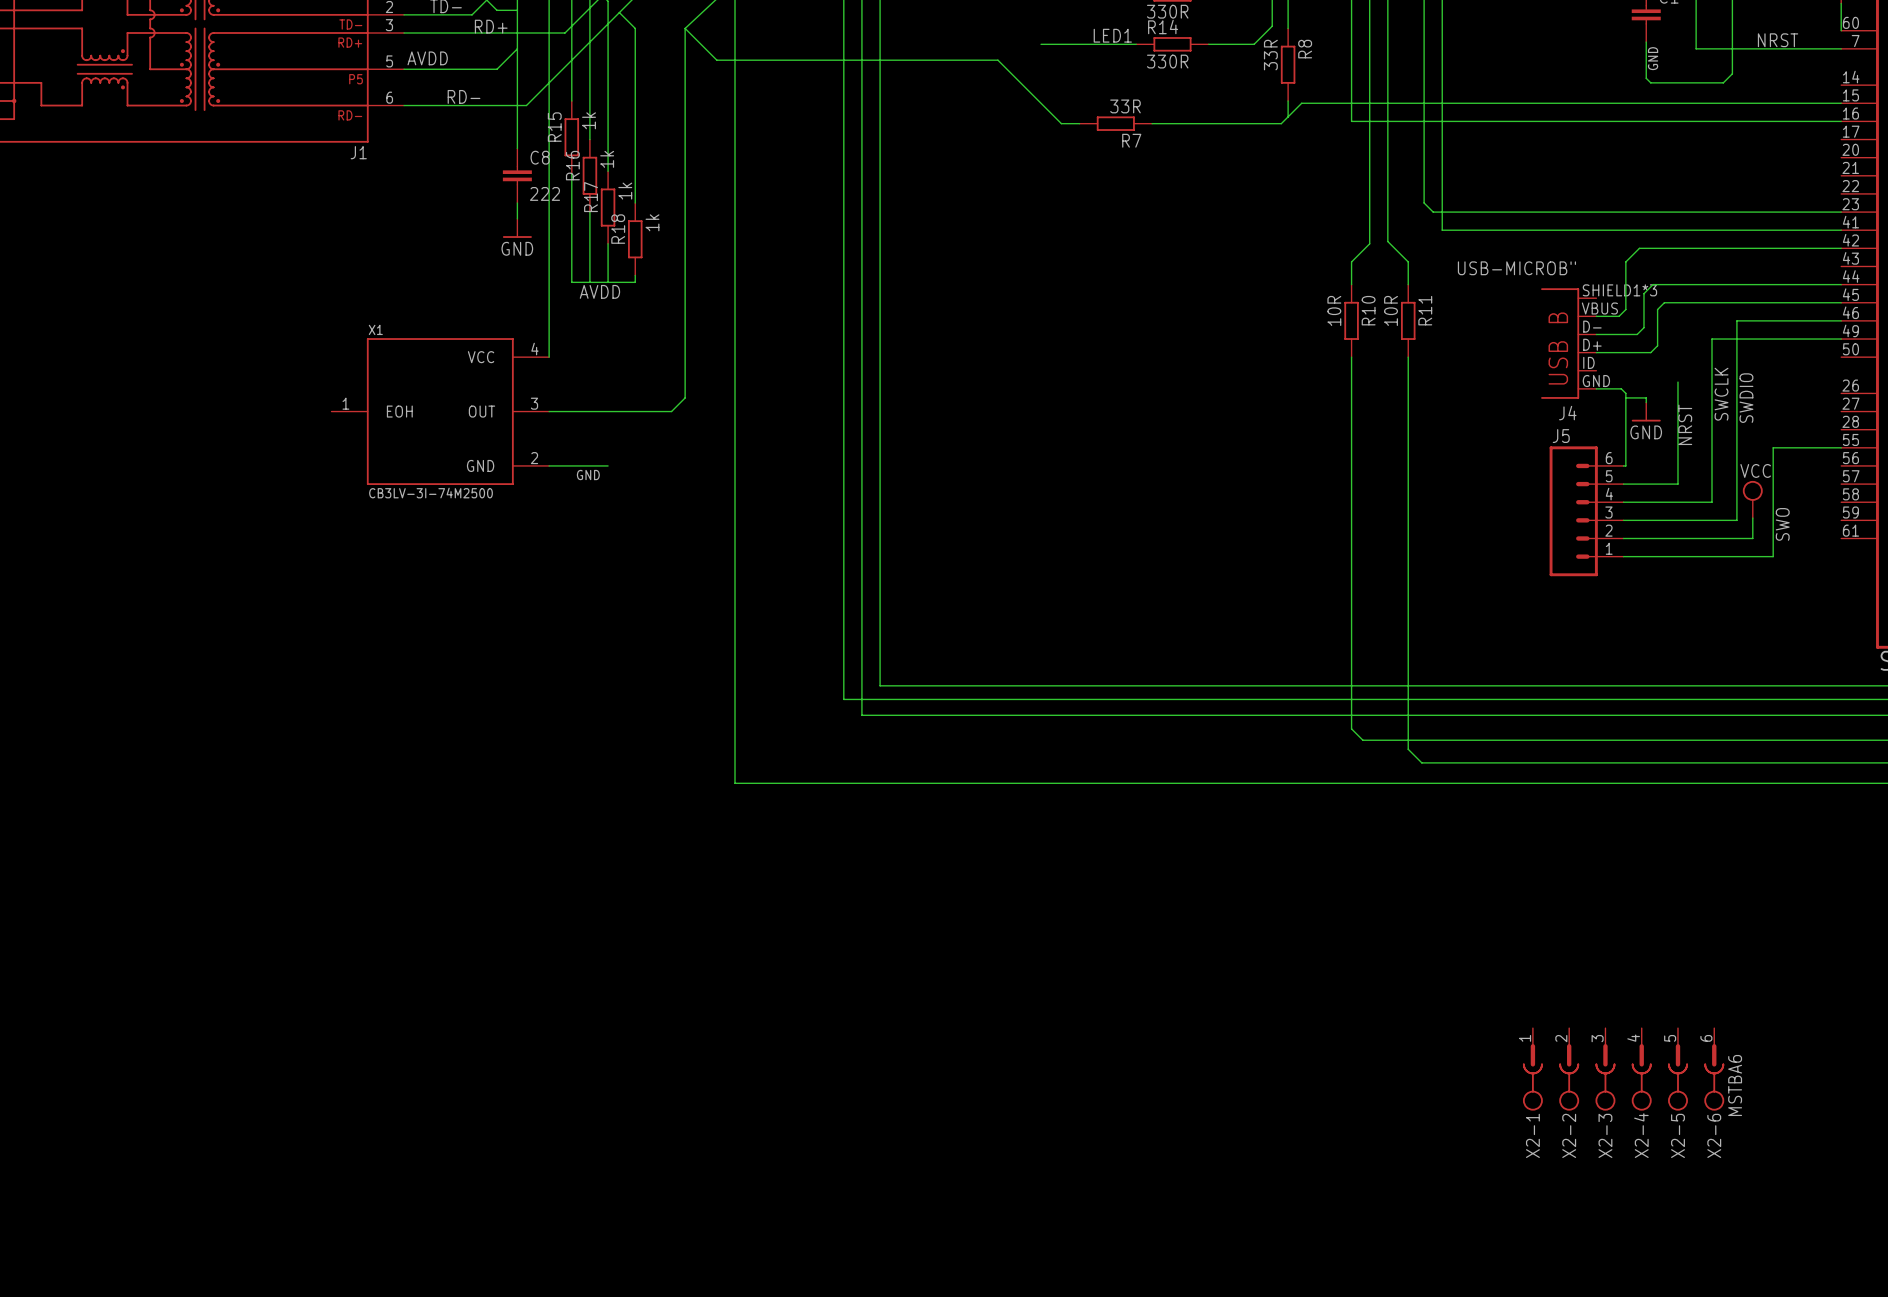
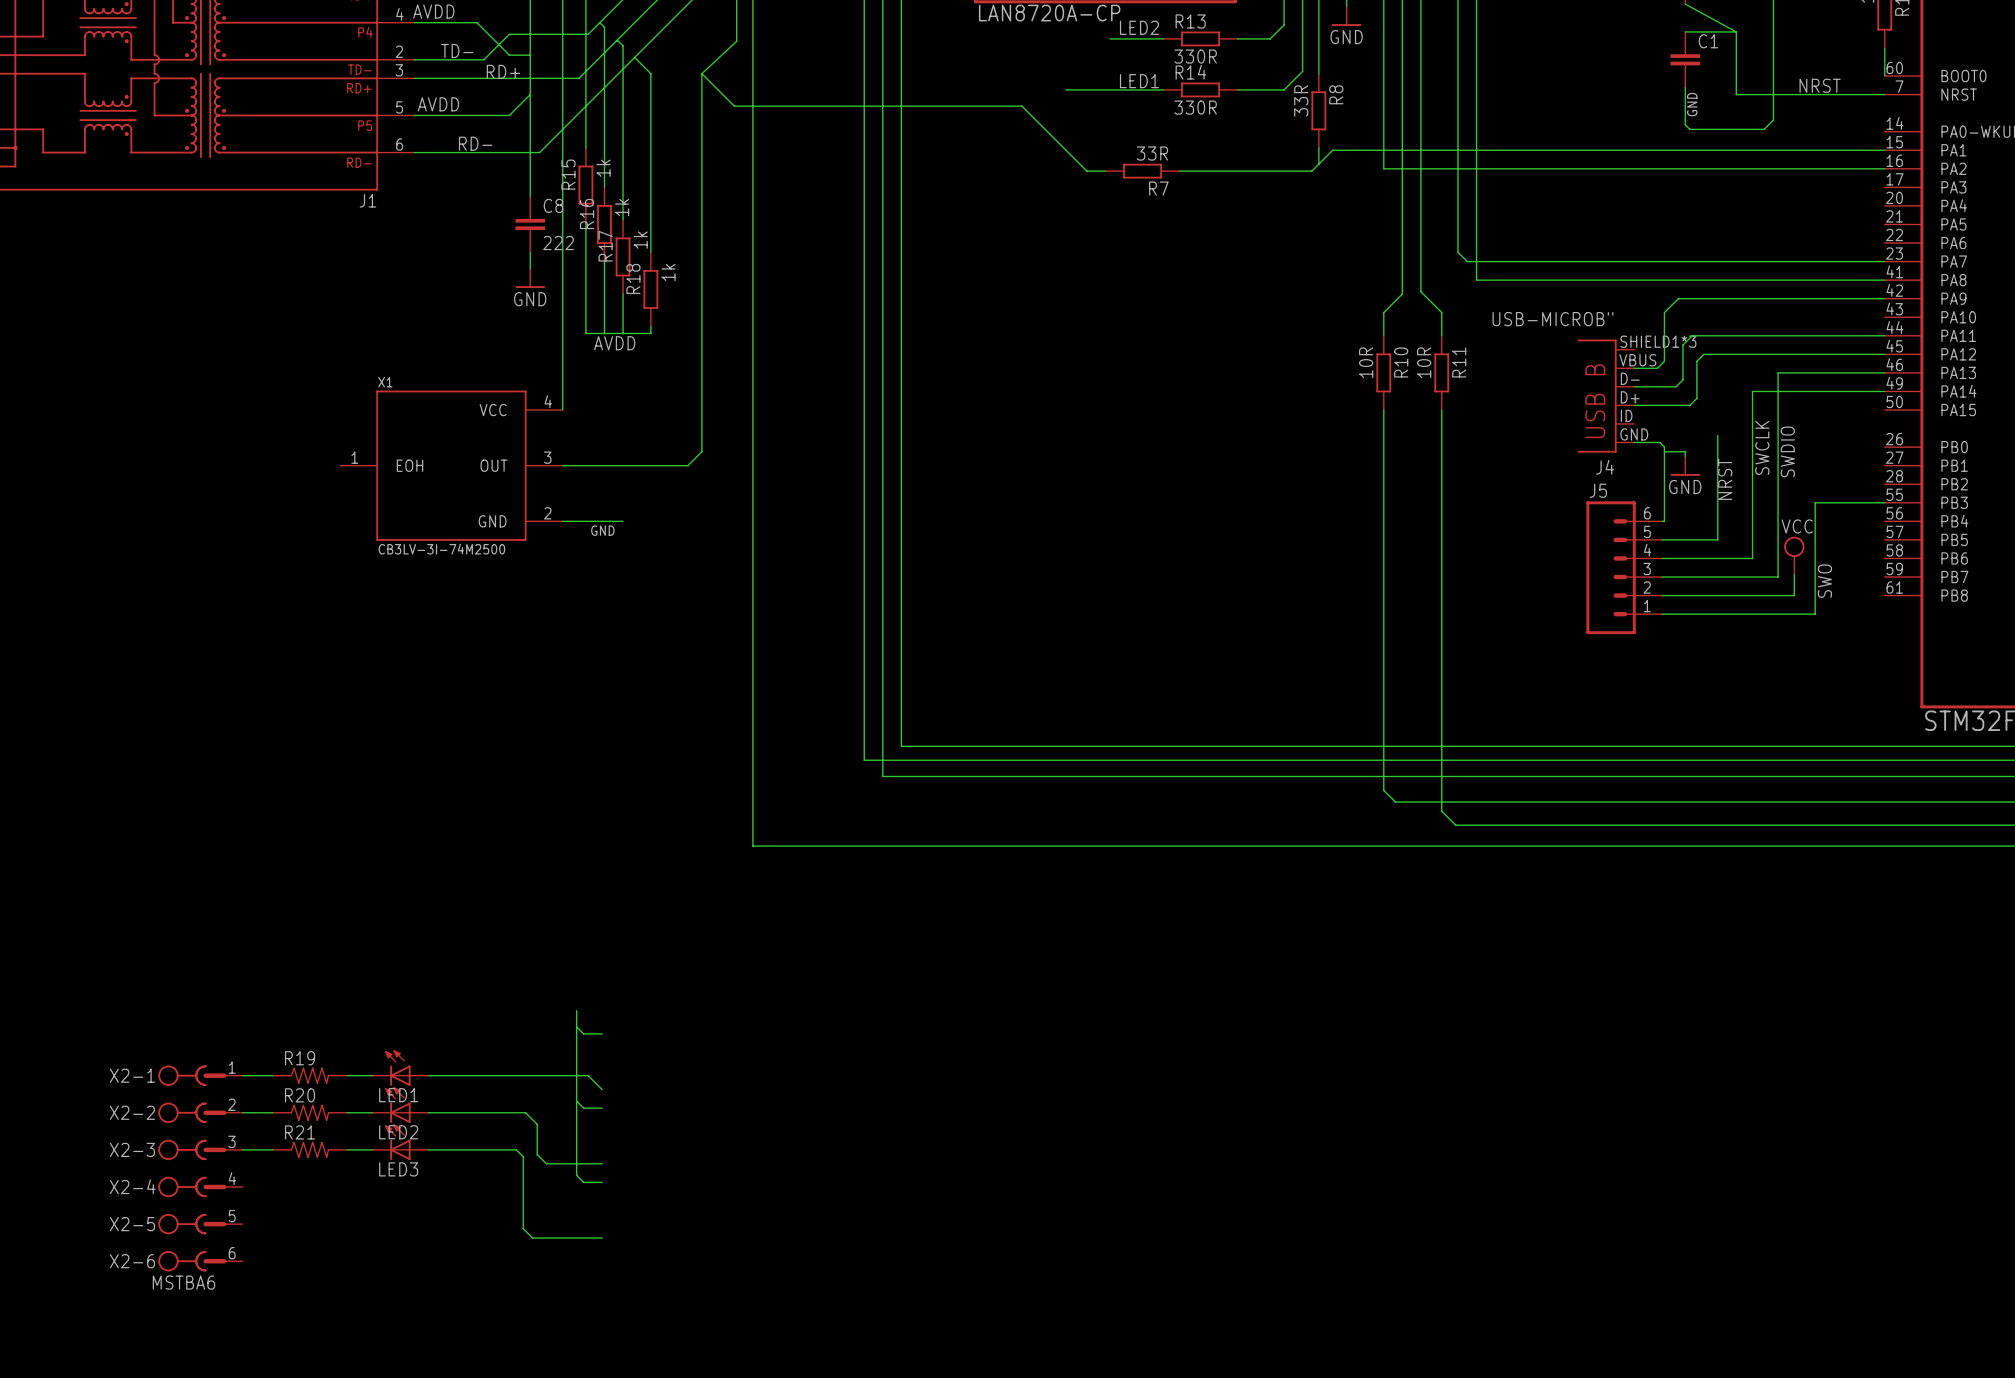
wire: none -> (576, 1010) (576, 1175) (583, 1182) (602, 1182)
wire: none -> (576, 1026) (583, 1033) (602, 1033)
LED1: none -> (400, 1067)
wire: none -> (242, 1075) (272, 1075)
R19: none -> (309, 1075)
wire: none -> (347, 1075) (372, 1075)
wire: none -> (428, 1075) (588, 1075) (602, 1089)
wire: none -> (576, 1101) (583, 1108) (602, 1108)
LED2: none -> (400, 1105)
wire: none -> (242, 1112) (272, 1112)
R20: none -> (309, 1112)
wire: none -> (347, 1112) (372, 1112)
wire: none -> (428, 1112) (525, 1112) (537, 1124) (537, 1154) (546, 1163) (602, 1163)
X2-1 position: (1532, 1069) -> (200, 1075)
X2-2 position: (1569, 1069) -> (200, 1112)
X2-3 position: (1605, 1069) -> (200, 1149)
X2-4 position: (1641, 1069) -> (200, 1187)
X2-5 position: (1677, 1069) -> (200, 1224)
X2-6 position: (1714, 1069) -> (200, 1261)
LED3: none -> (400, 1142)
X2-1 rotation: 0° (1532, 1077) -> 90° clockwise (192, 1075)
X2-2 rotation: 0° (1569, 1077) -> 90° clockwise (192, 1112)
X2-3 rotation: 0° (1605, 1077) -> 90° clockwise (192, 1149)
X2-4 rotation: 0° (1641, 1077) -> 90° clockwise (192, 1187)
X2-5 rotation: 0° (1677, 1077) -> 90° clockwise (192, 1224)
X2-6 rotation: 0° (1714, 1077) -> 90° clockwise (192, 1261)
wire: none -> (242, 1149) (272, 1149)
R21: none -> (309, 1149)
wire: none -> (347, 1149) (372, 1149)
wire: none -> (428, 1149) (516, 1149) (523, 1156) (523, 1228) (532, 1238) (602, 1238)

